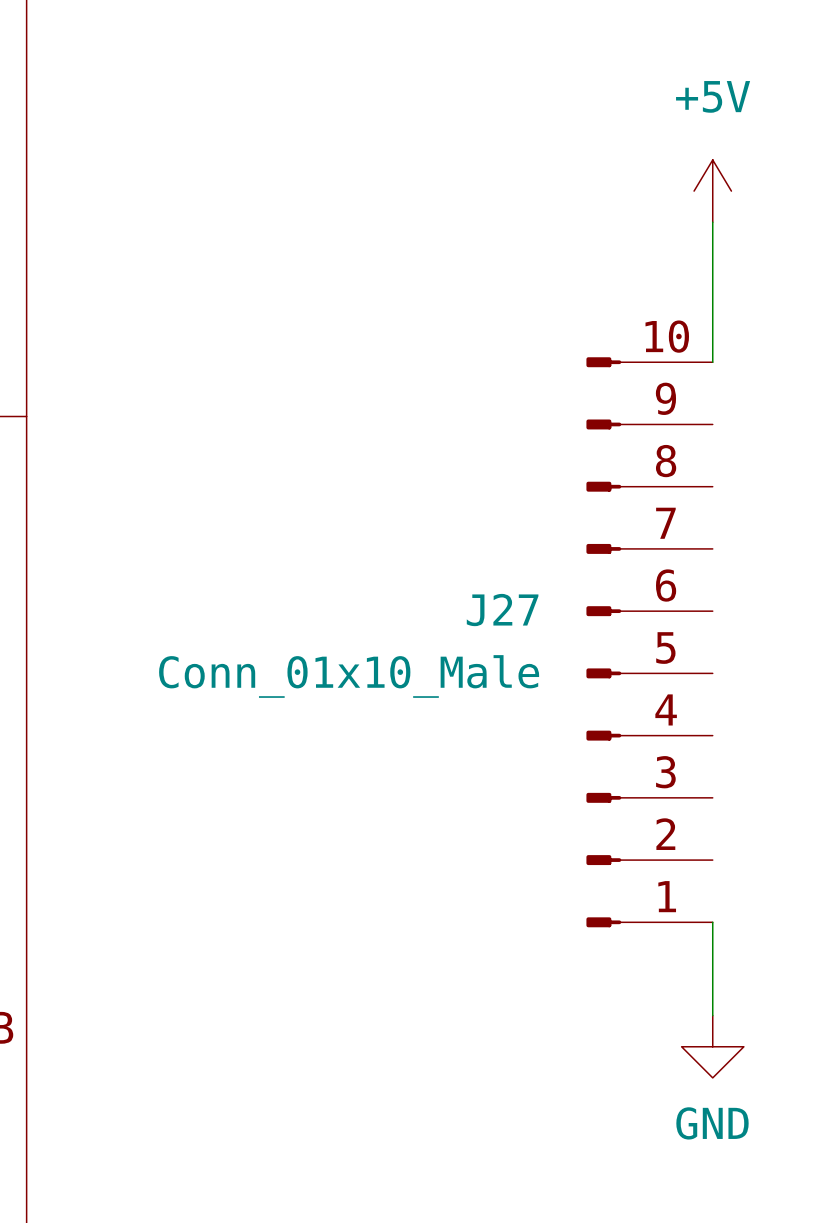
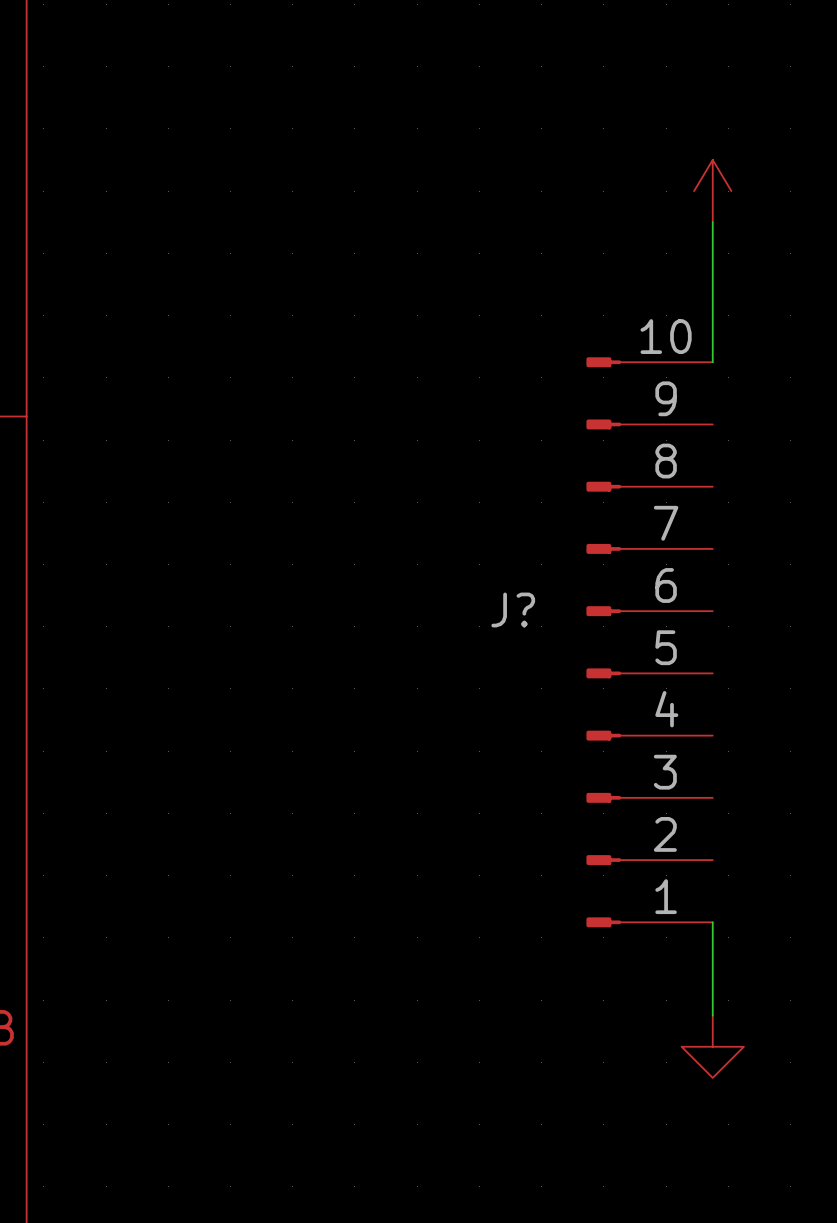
power symbol text: +5V (713, 96) -> none
J27 name: J27 (502, 610) -> J? (513, 609)
J27 value: Conn_01x10_Male (349, 676) -> none
power symbol text: GND (712, 1123) -> none

